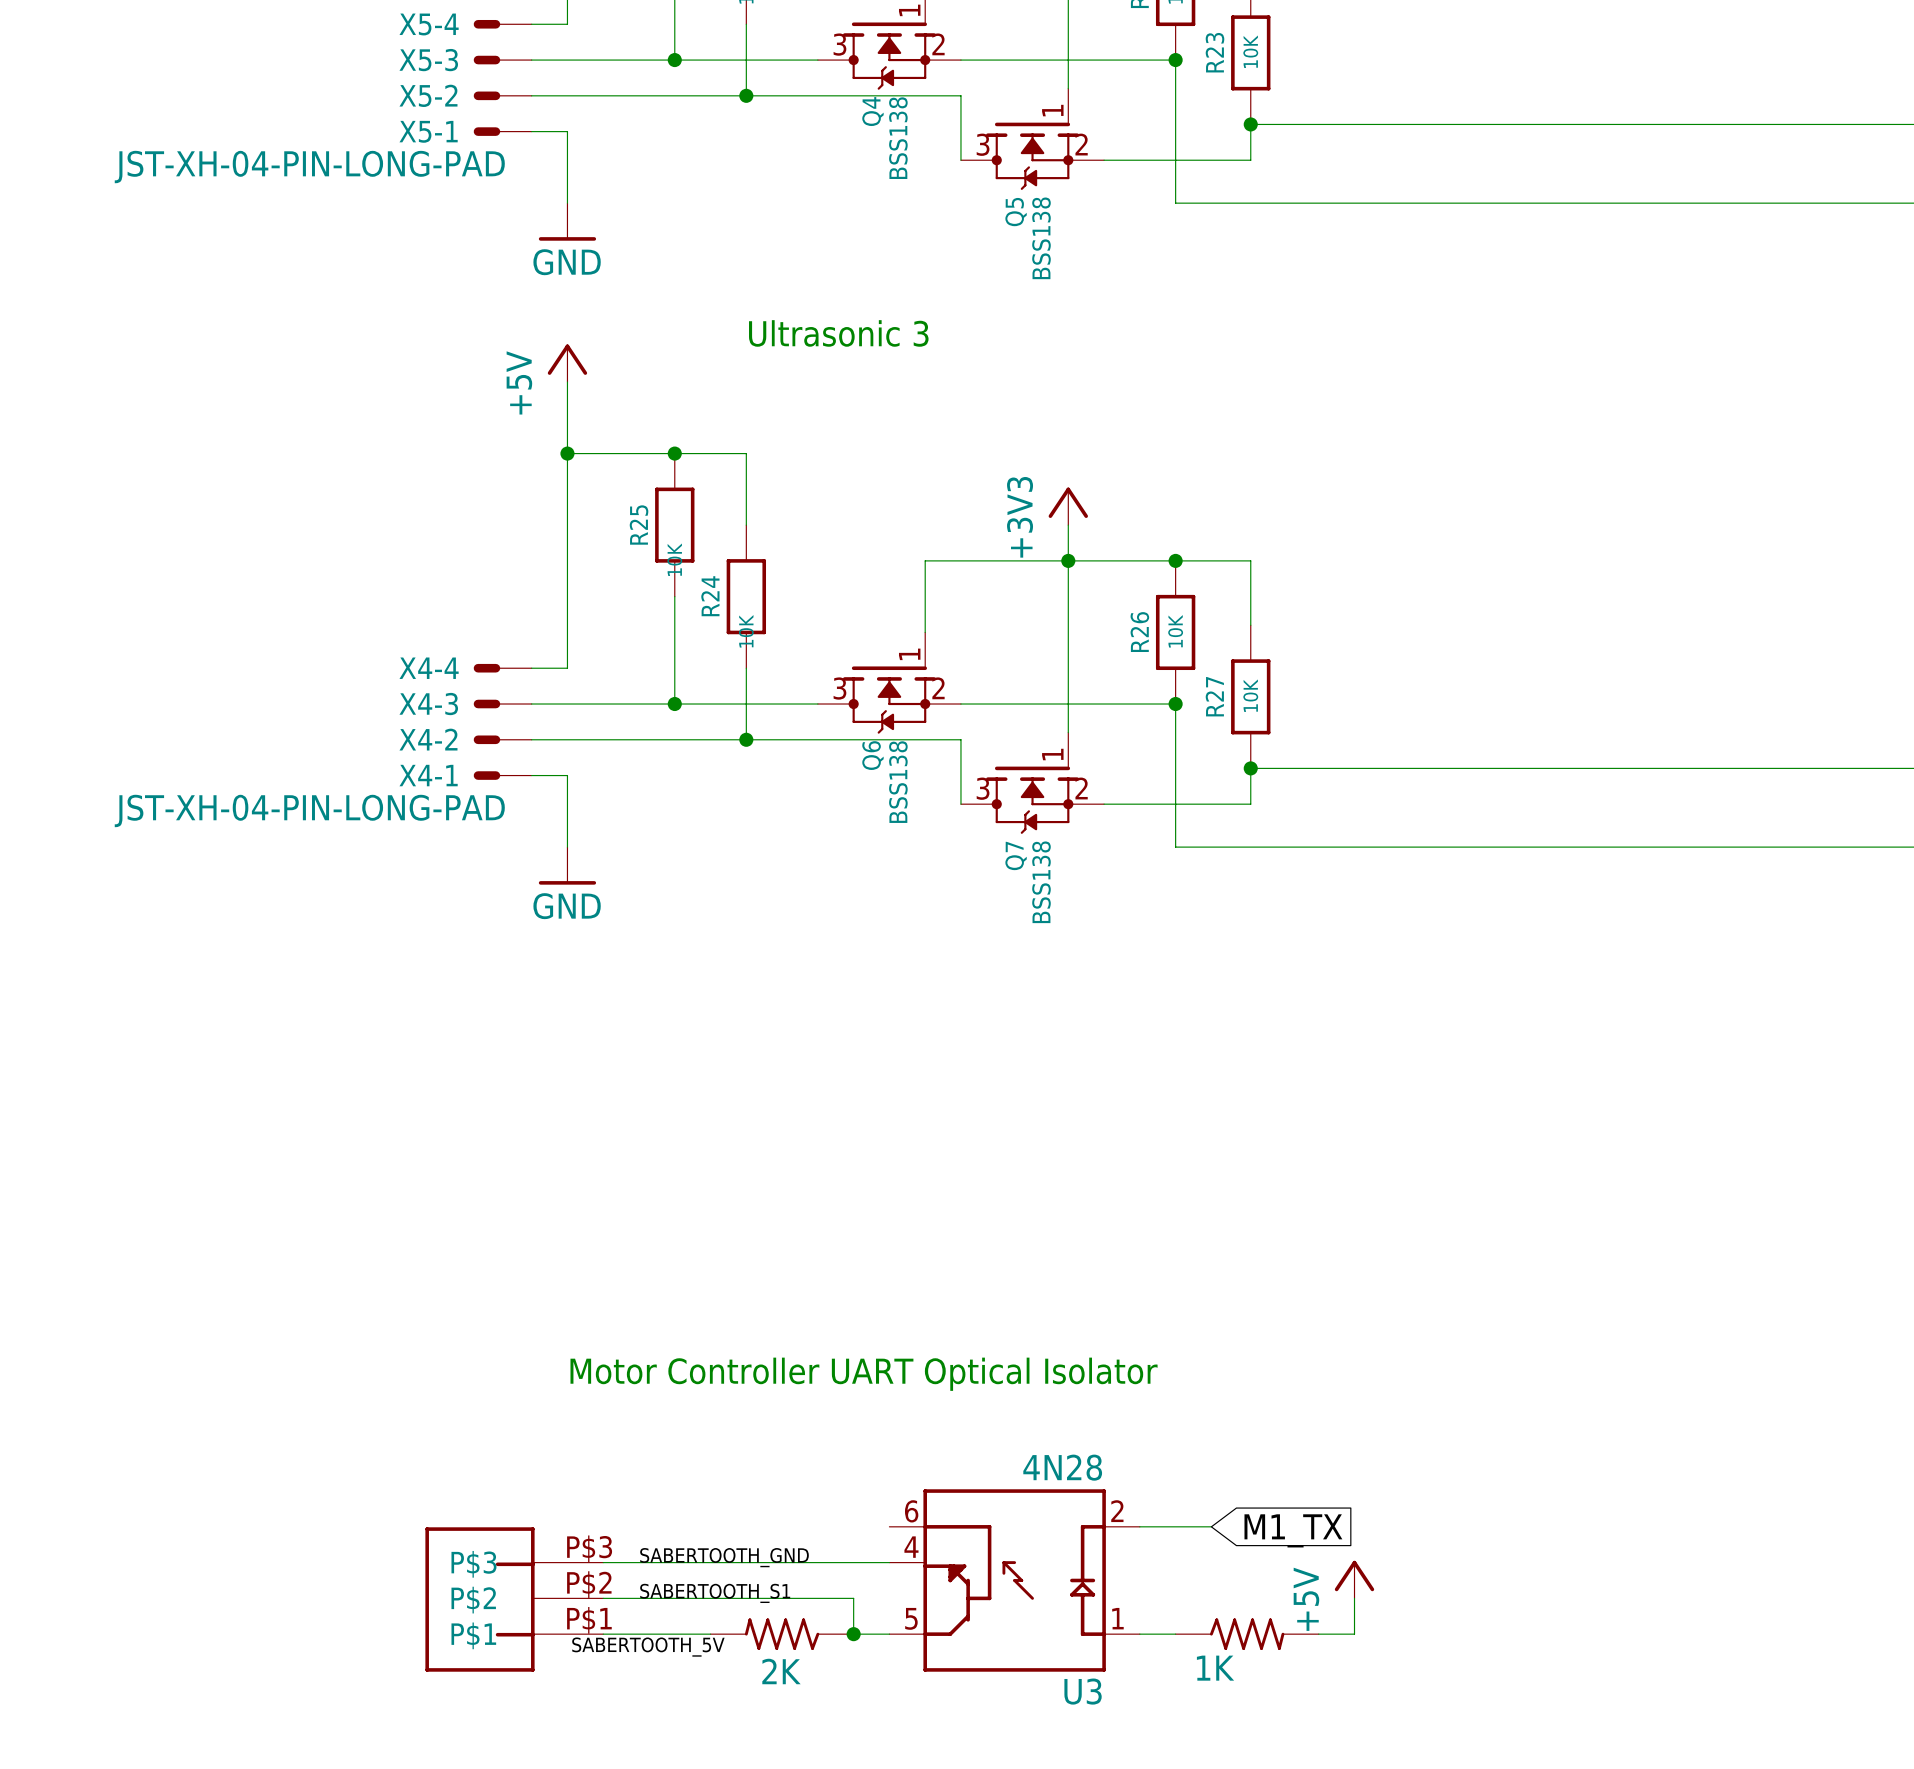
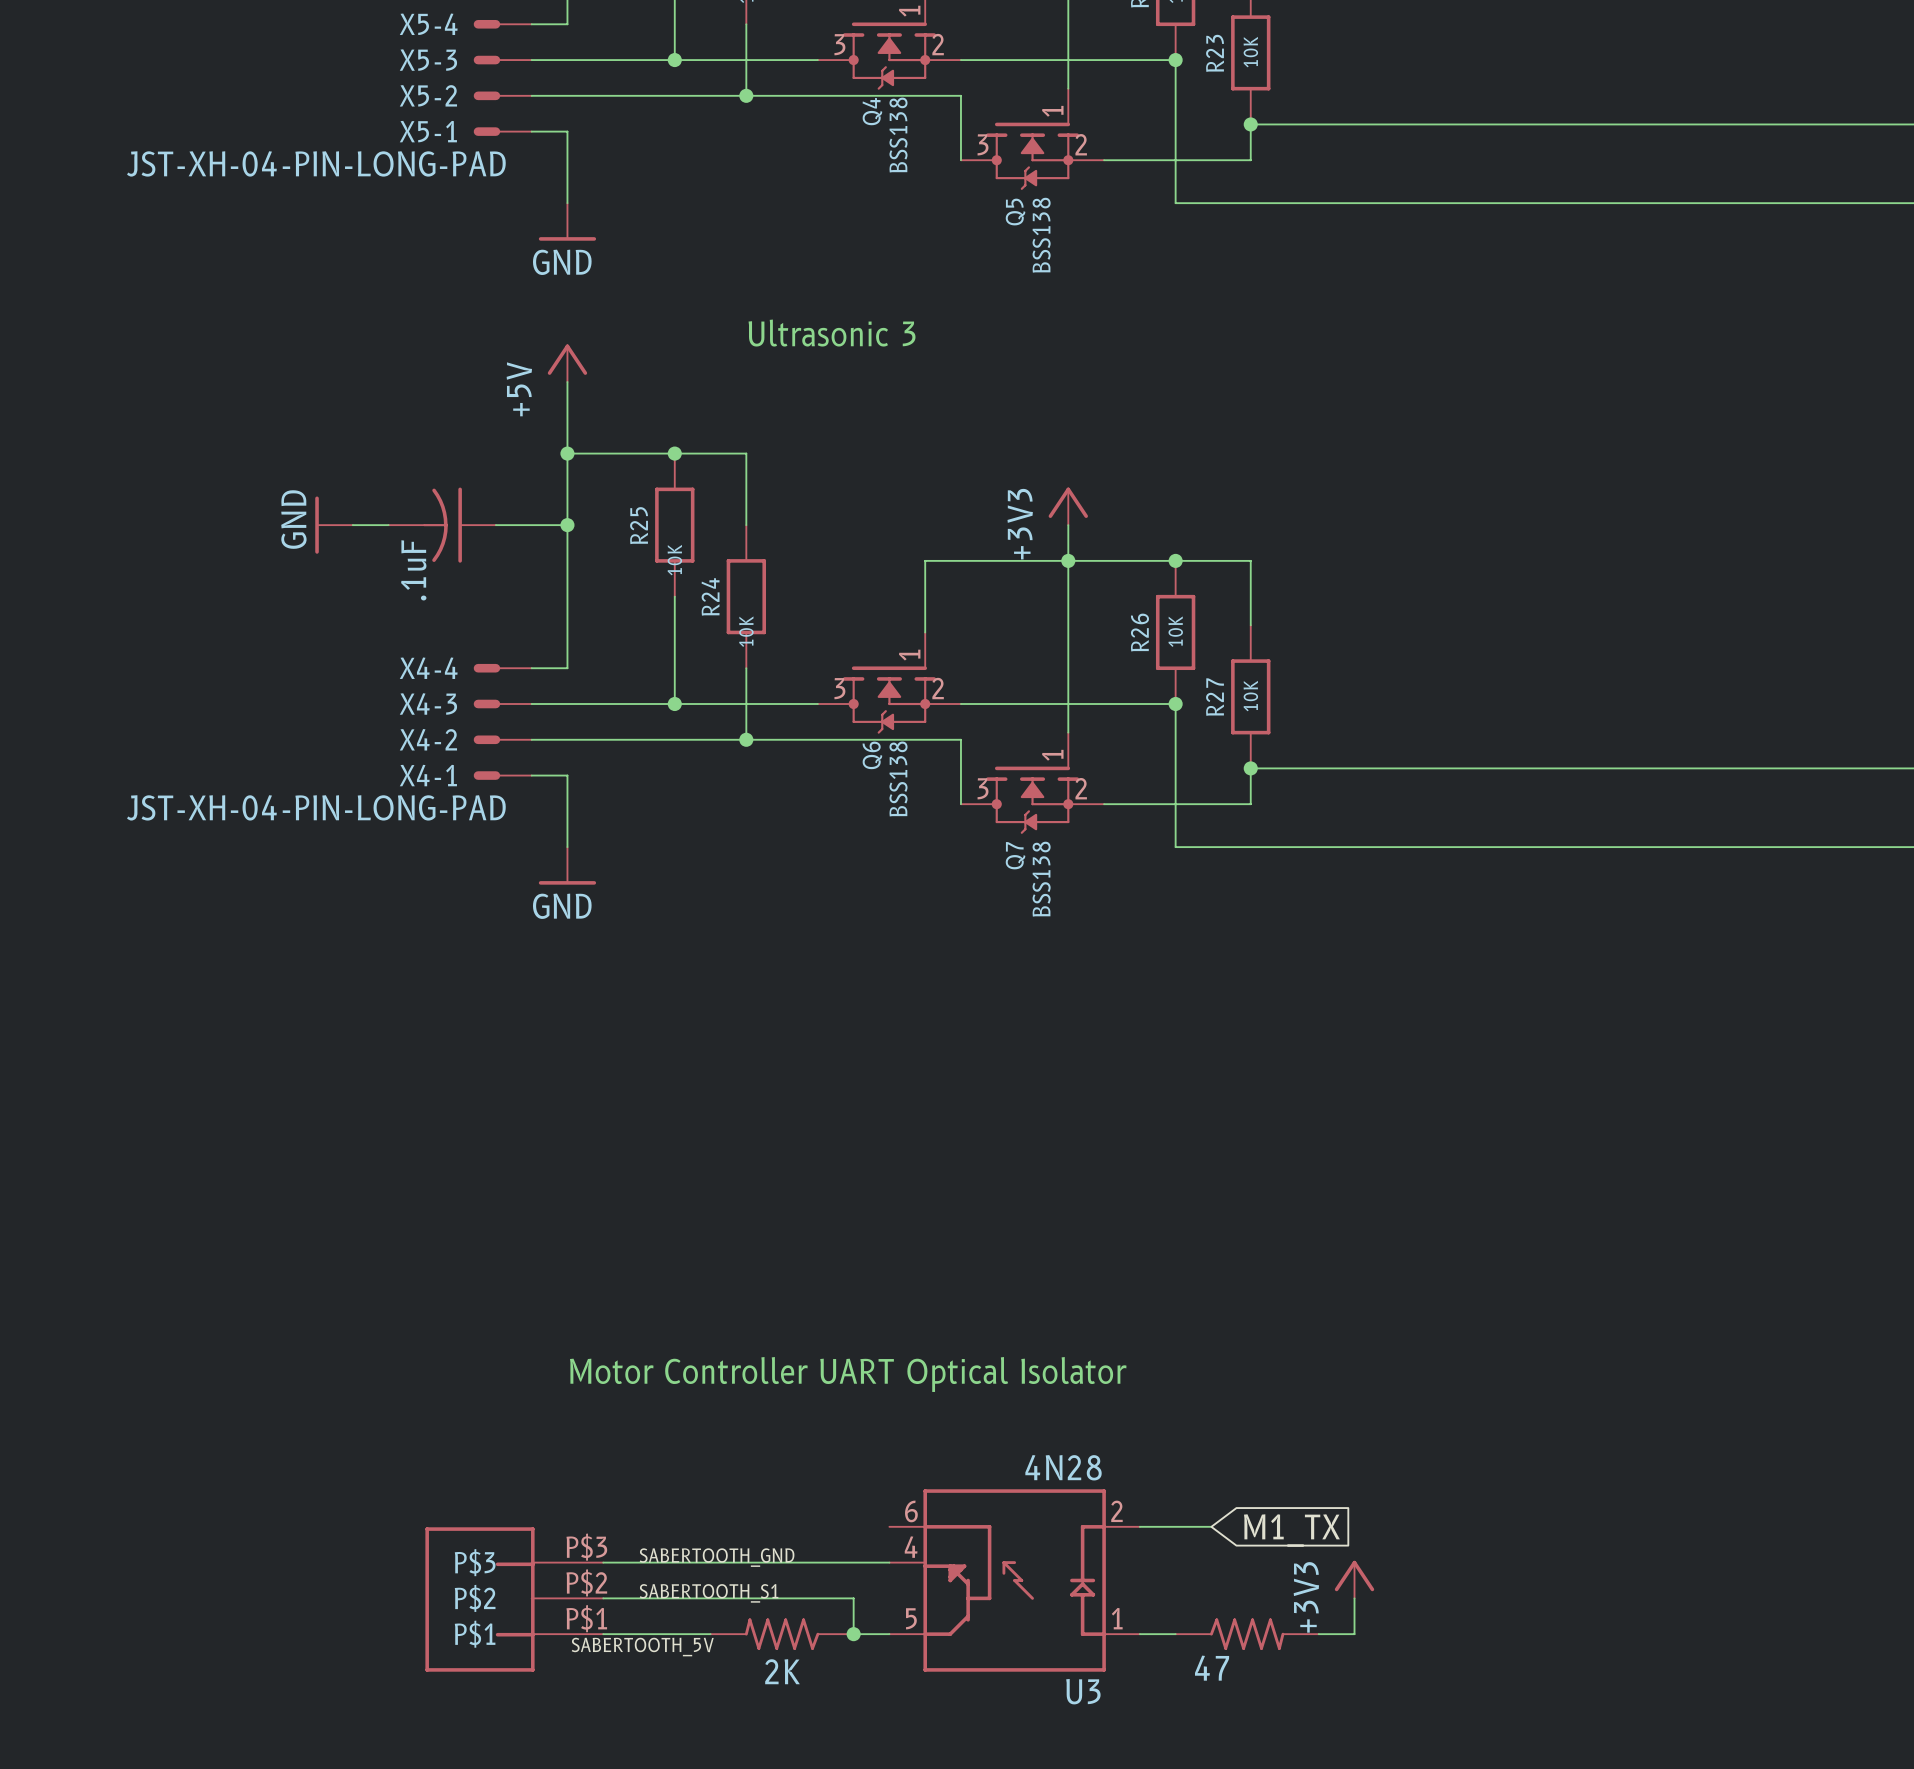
power symbol: none -> GND (334, 525)
wire: none -> (352, 525) (388, 525)
part: none -> .1uF (442, 525)
wire: none -> (495, 525) (567, 525)
junction: none -> (567, 525)
power symbol: +5V (1354, 1579) -> +3V3 (1354, 1579)
part value: 1K (1215, 1668) -> 47 (1212, 1668)

